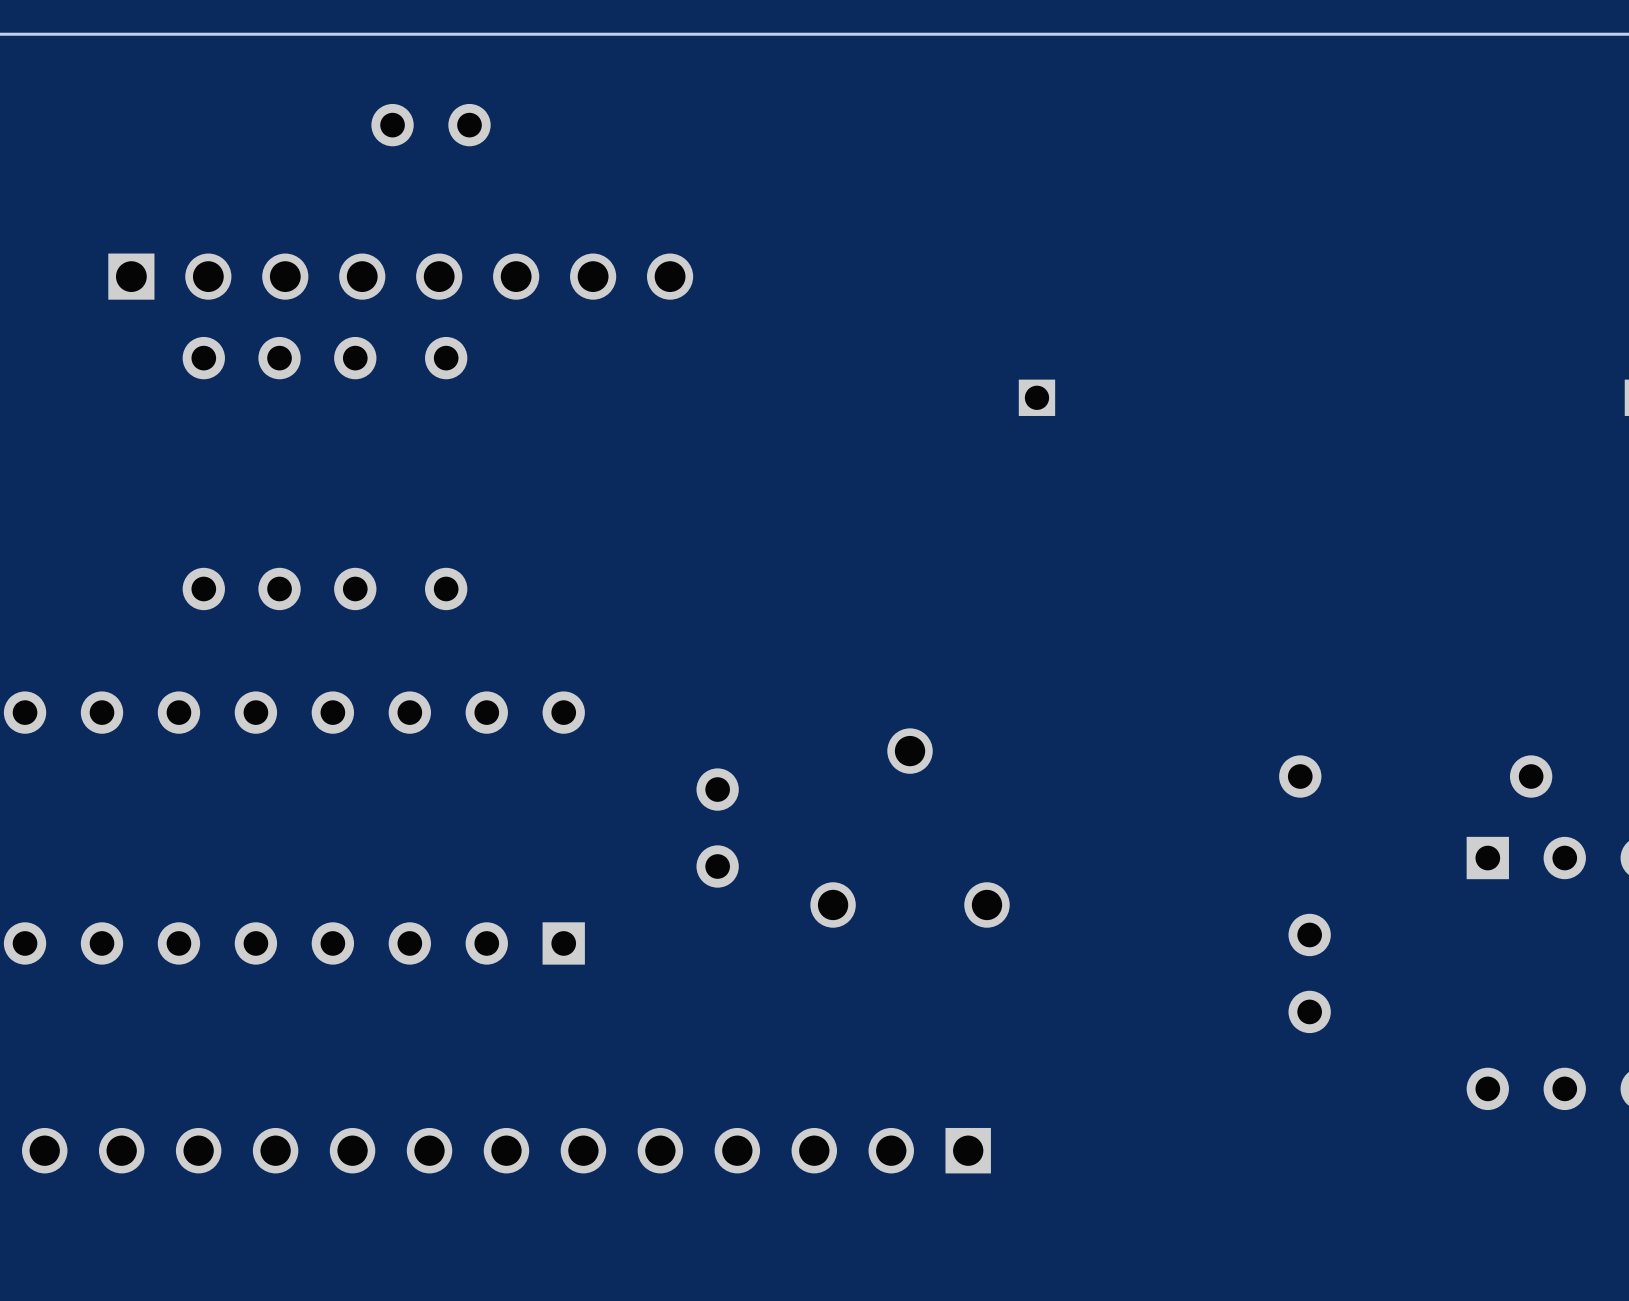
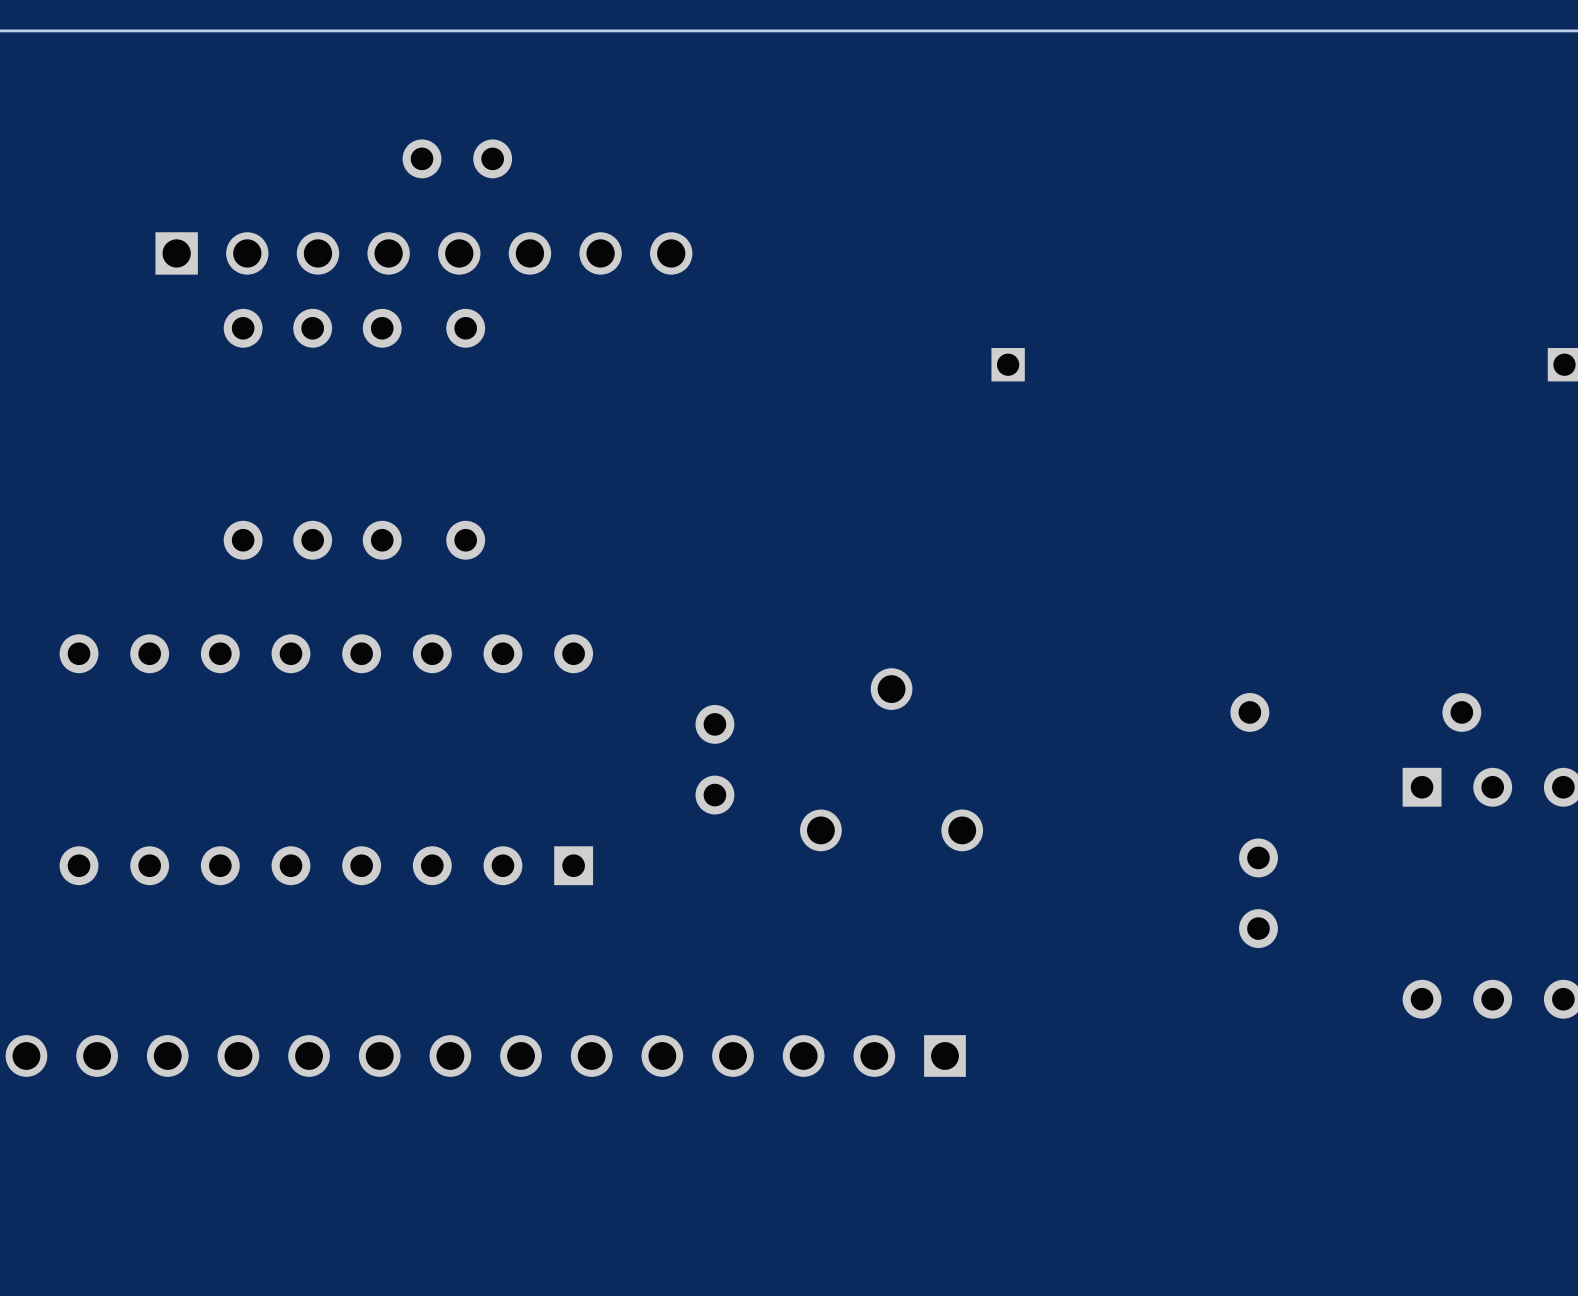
part position: (431, 125) -> (457, 158)

